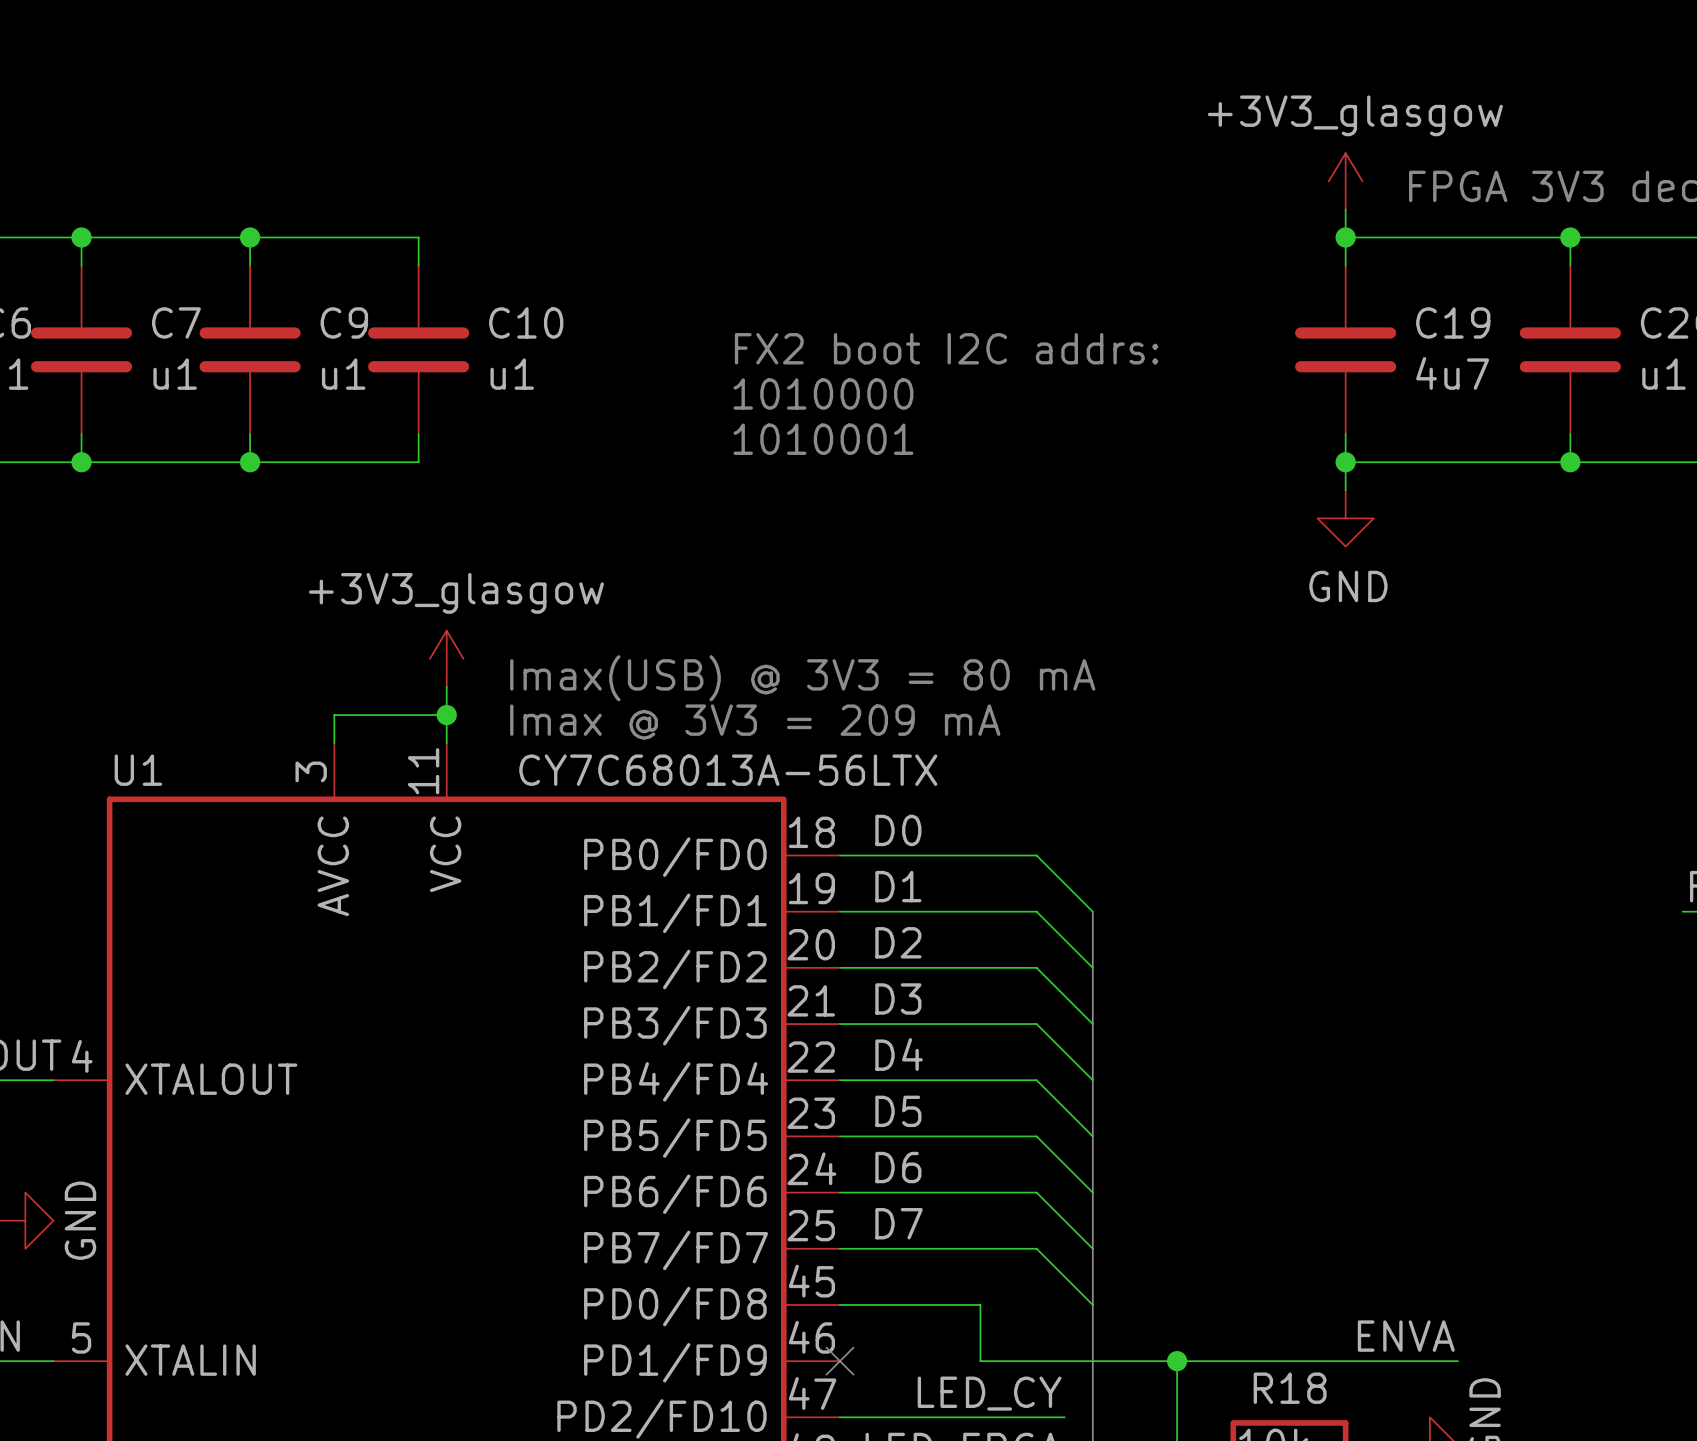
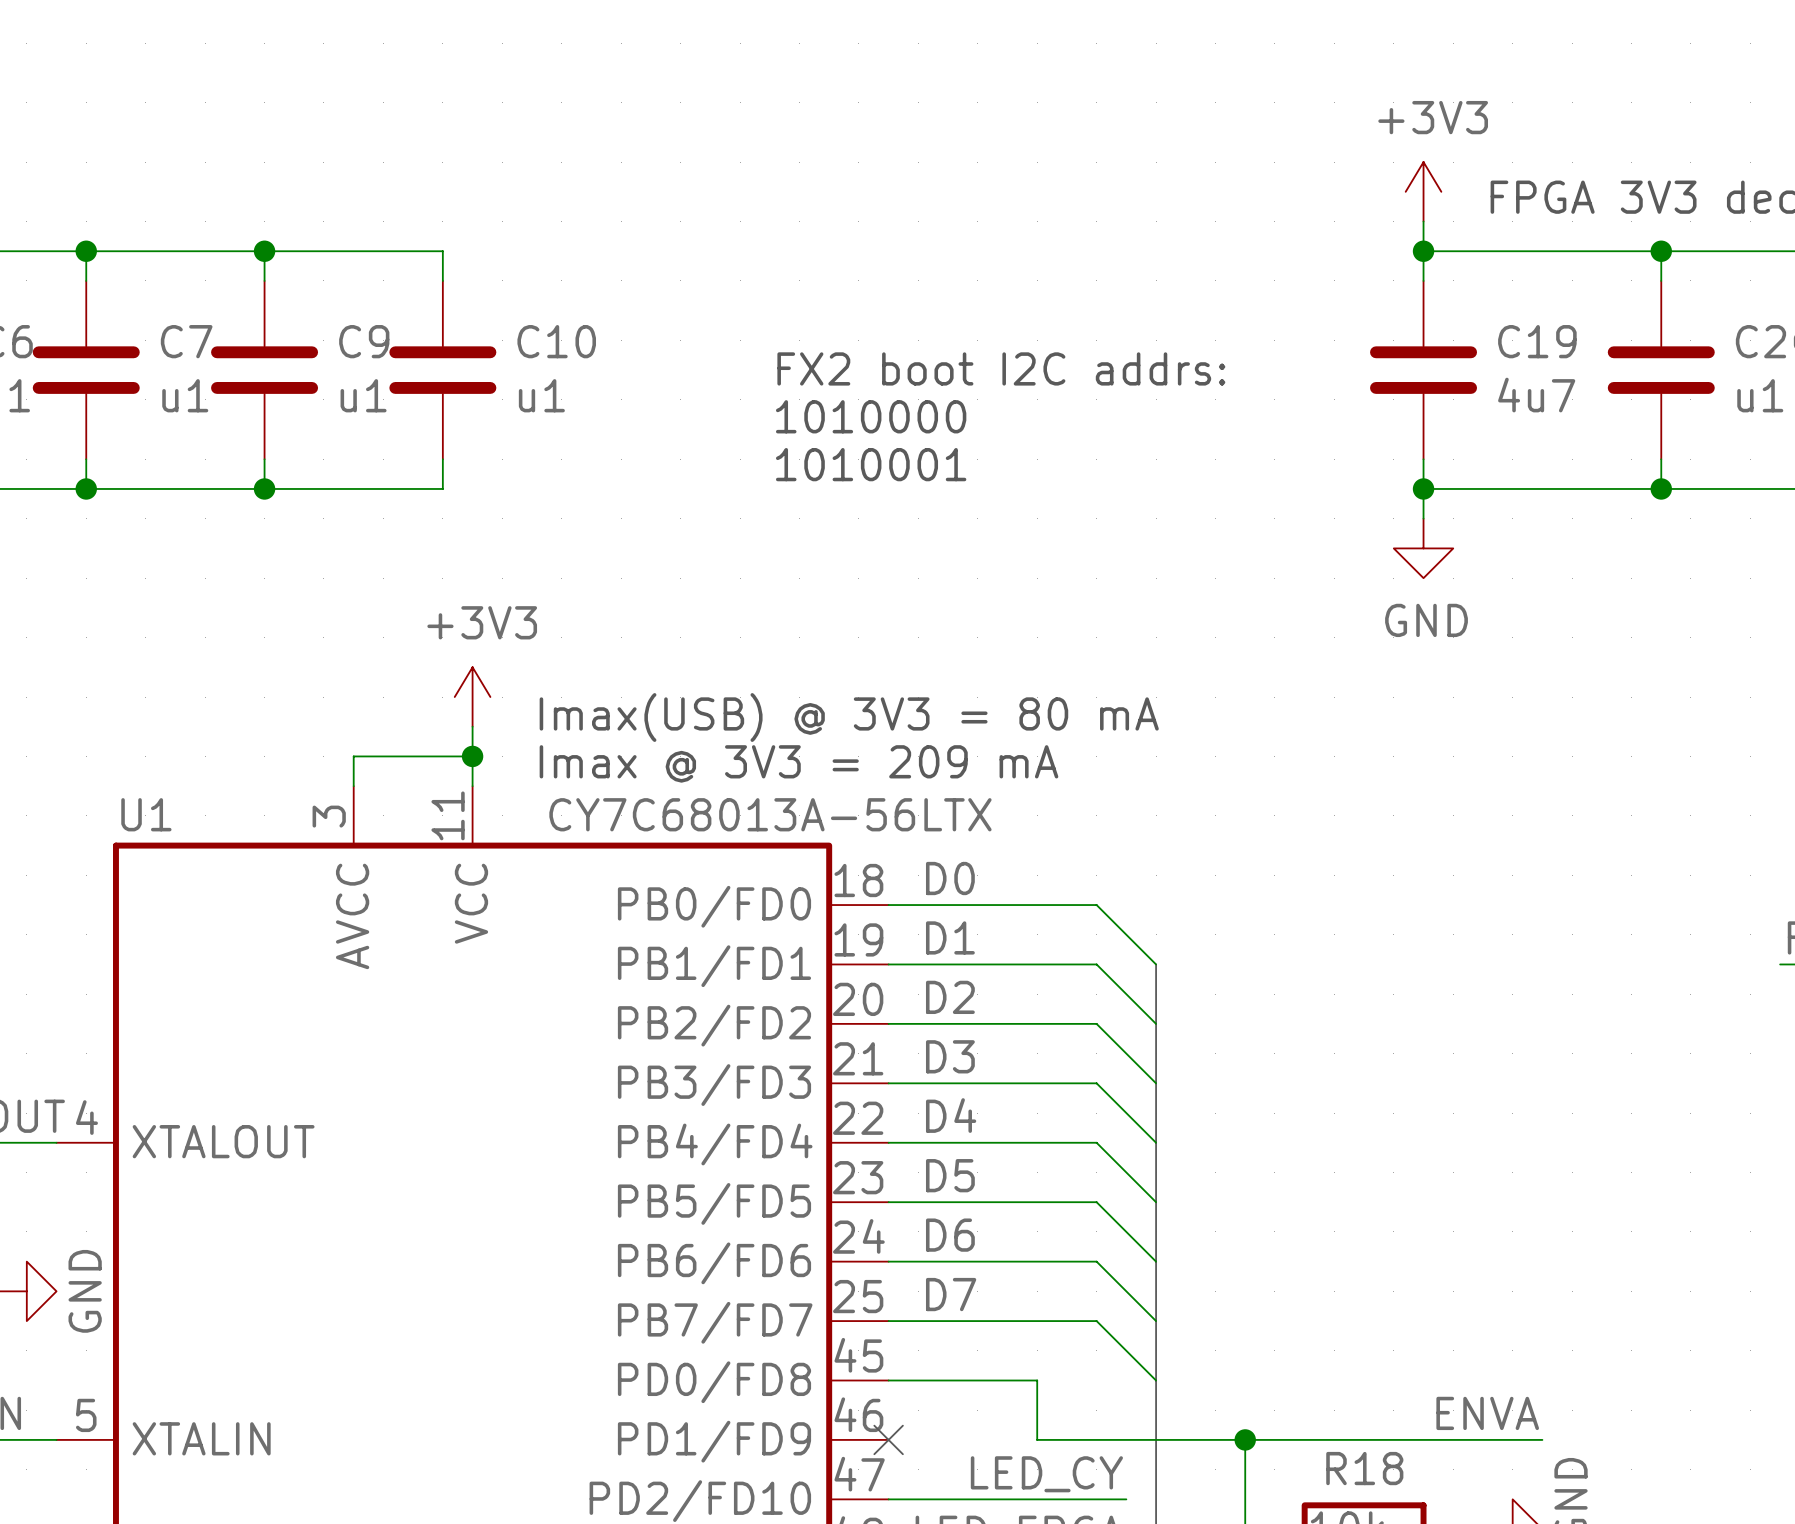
power symbol: +3V3_glasgow (1345, 181) -> +3V3 (1423, 191)
power symbol: +3V3_glasgow (446, 658) -> +3V3 (472, 697)

